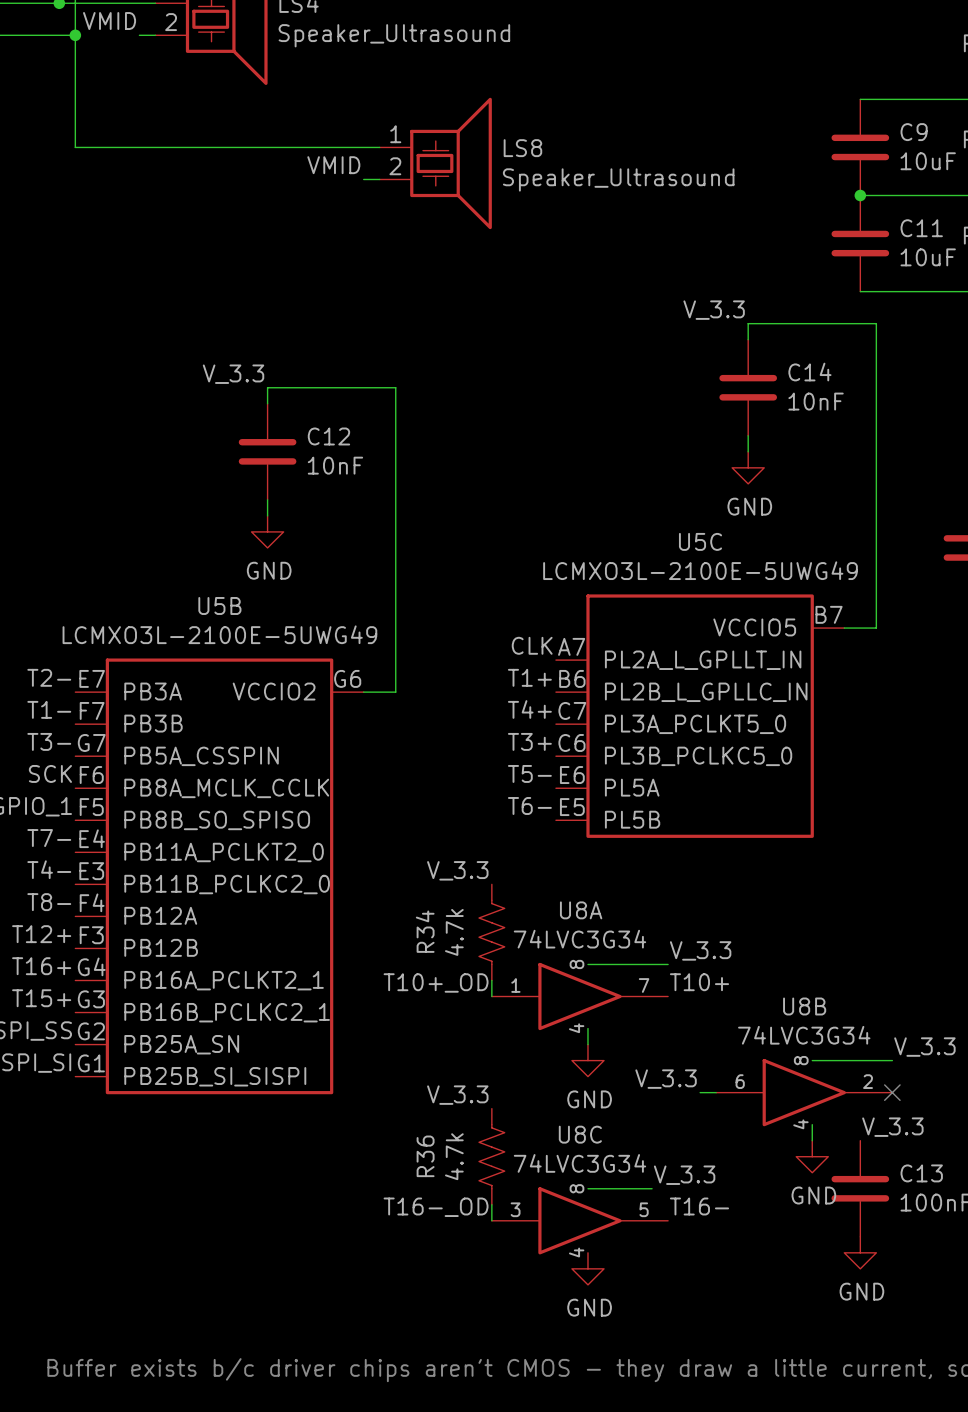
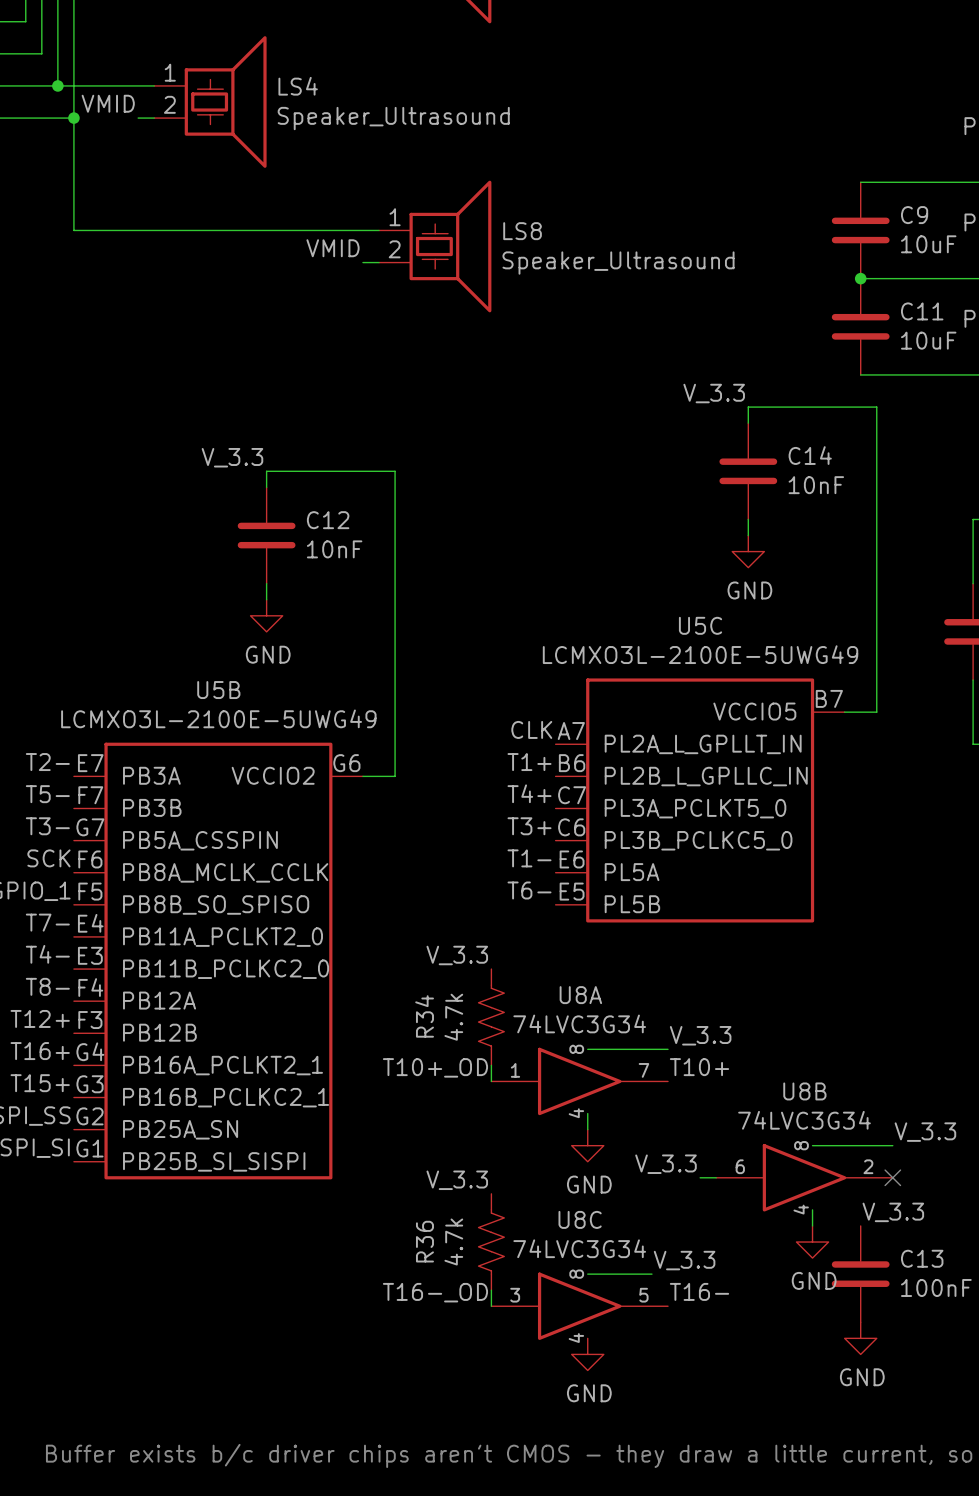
label: T1- (49, 709) -> T5- (47, 794)
label: T5- (529, 773) -> T1- (529, 858)

